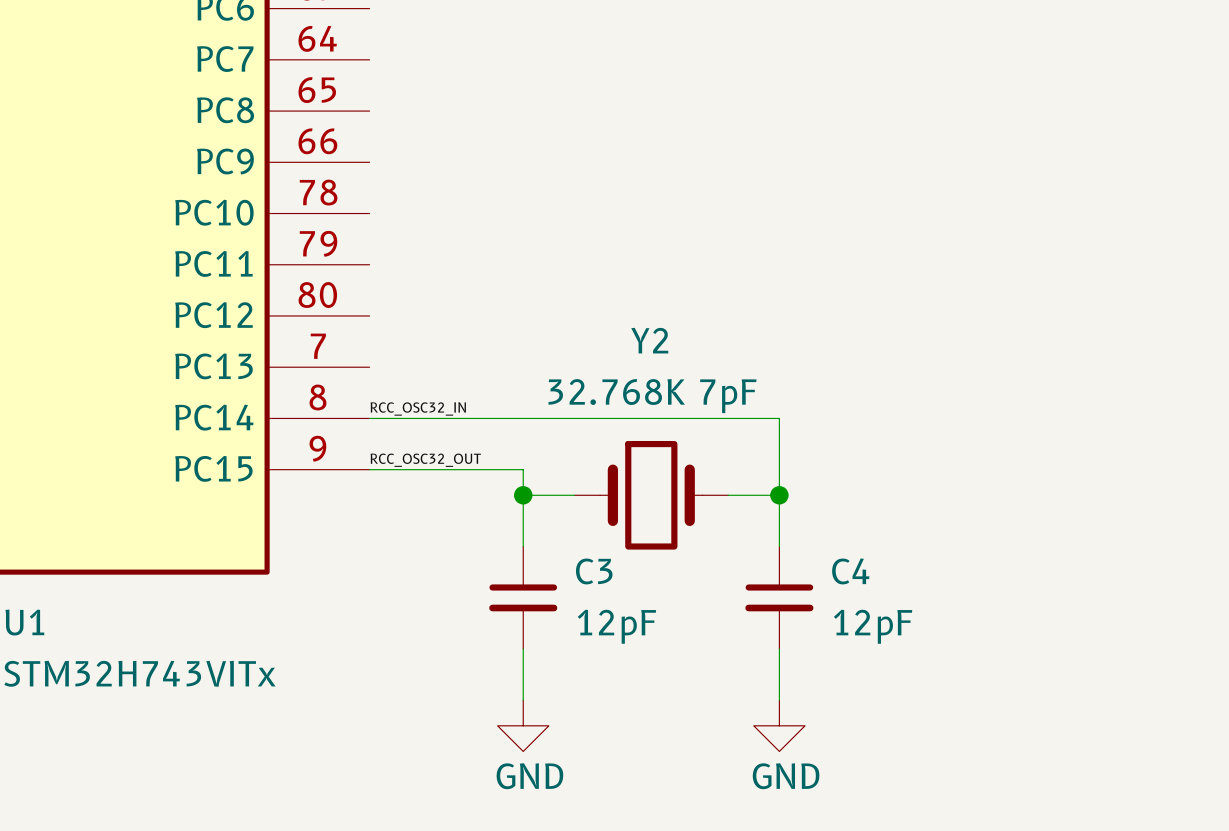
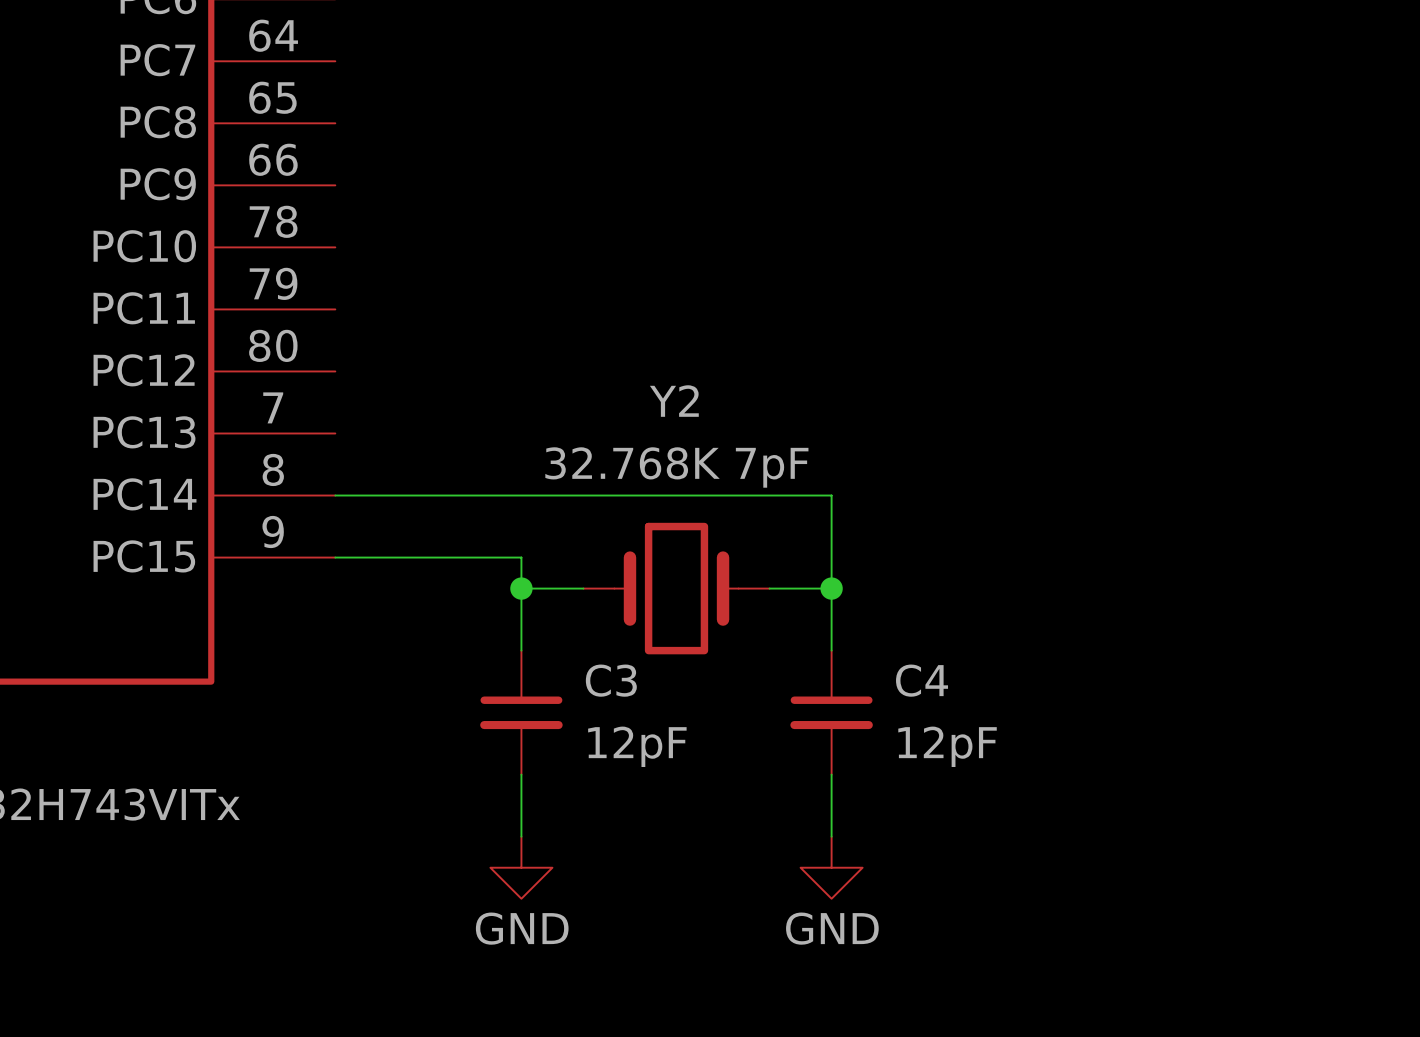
label: RCC_OSC32_IN (418, 408) -> none
label: RCC_OSC32_OUT (425, 460) -> none

